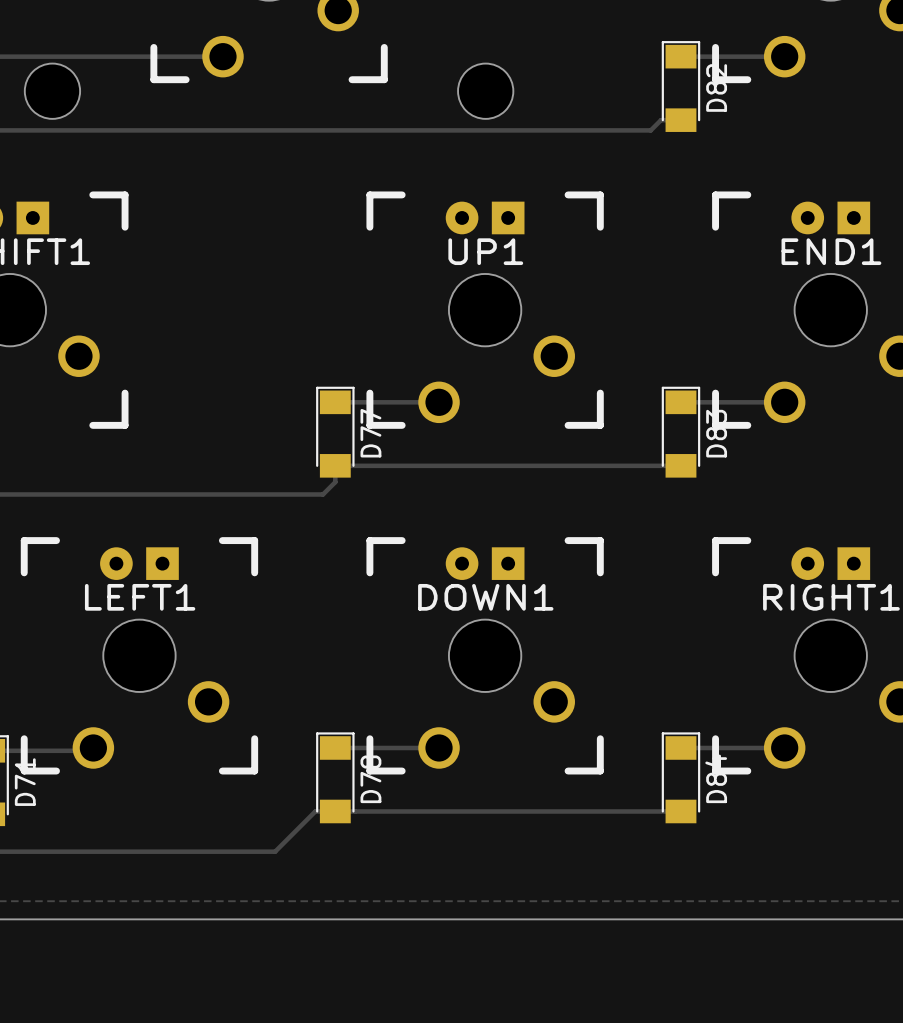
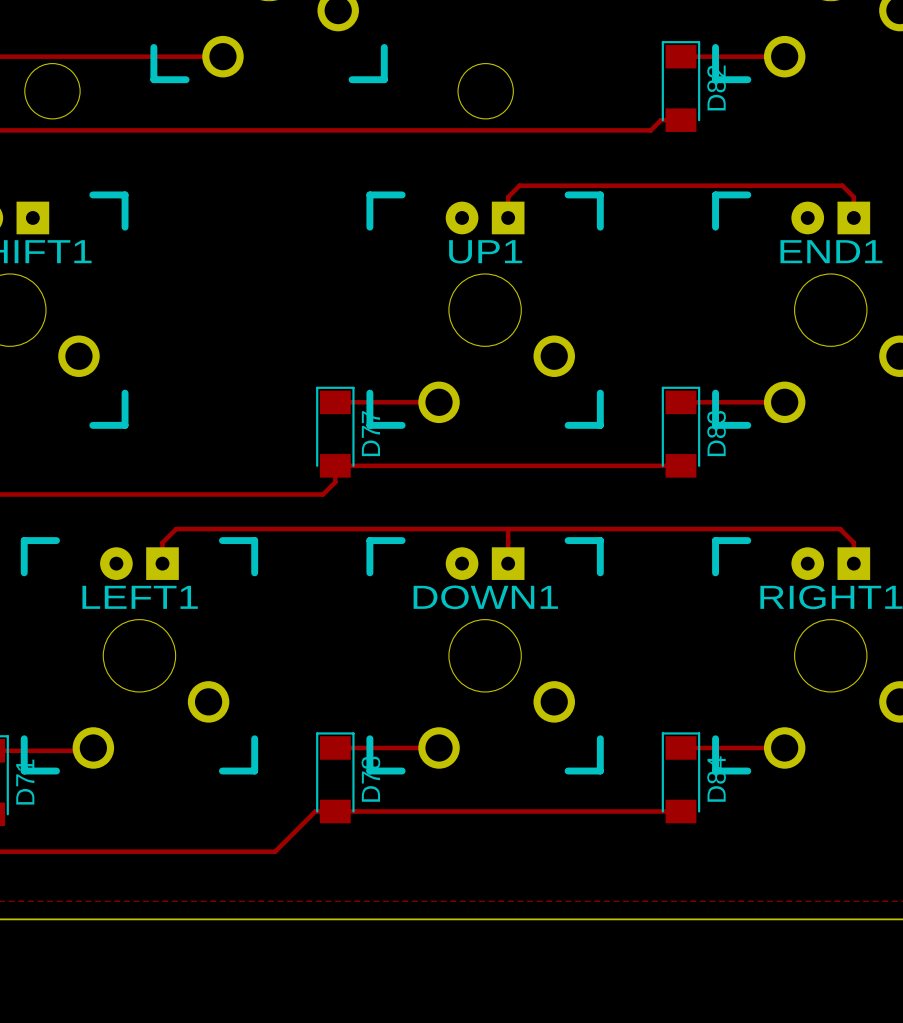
track: none -> (508, 217) (508, 197) (519, 185) (842, 185) (853, 197) (853, 217)
track: none -> (508, 529) (508, 563)
track: none -> (162, 563) (162, 542) (176, 529) (840, 529) (853, 542) (853, 563)

